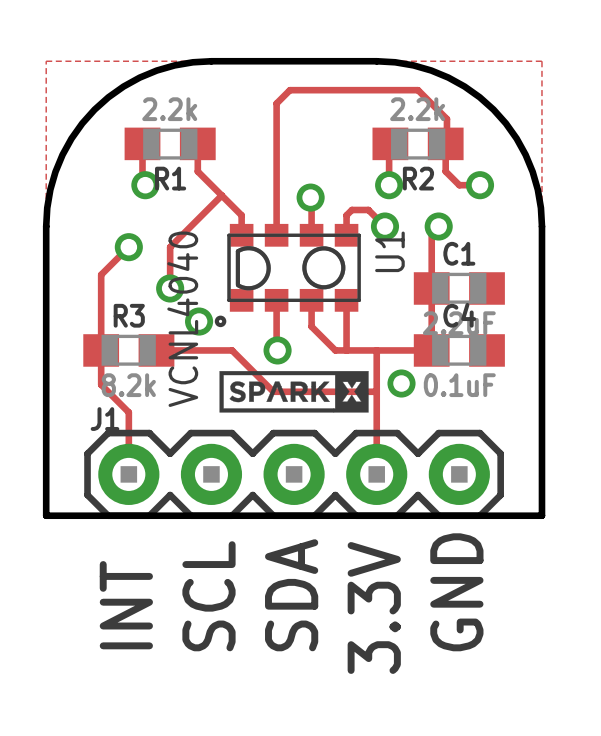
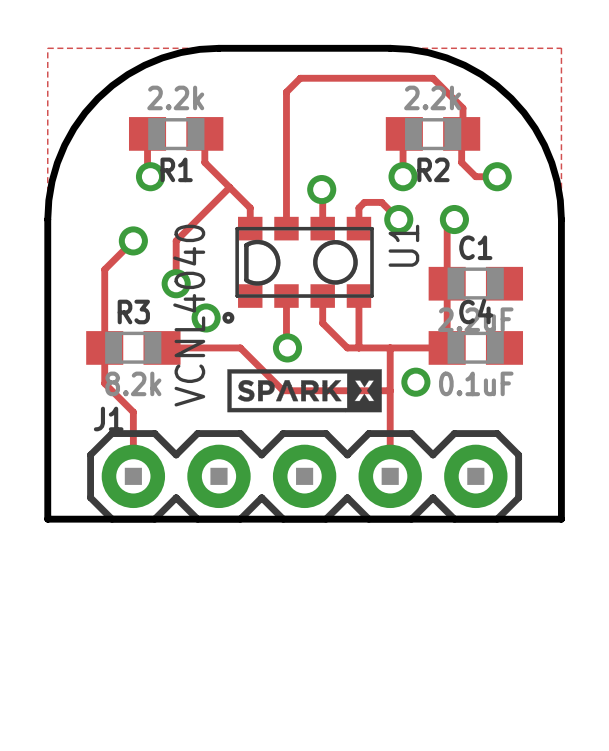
text: GND (456, 592) -> none
text: SDA (291, 595) -> none
text: SCL (208, 596) -> none
text: INT (126, 605) -> none
text: 3.3V (374, 607) -> none

